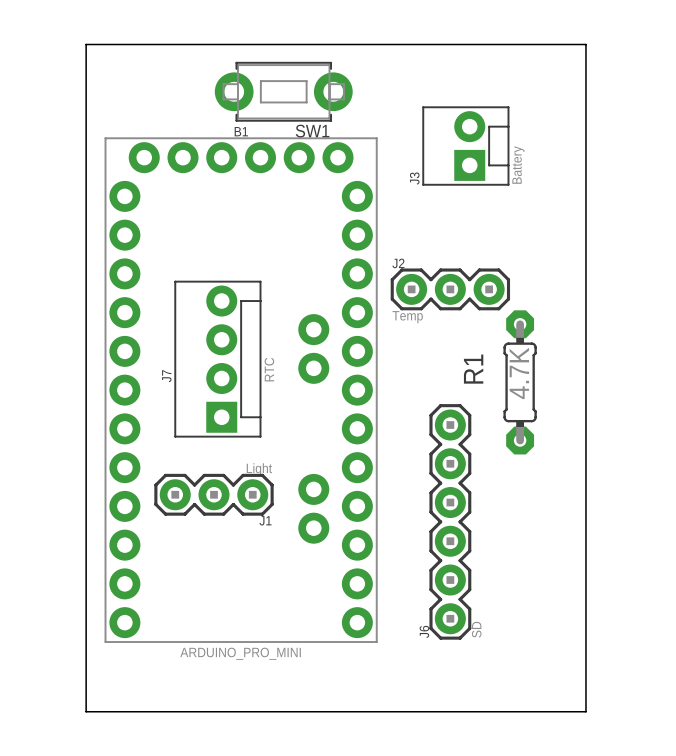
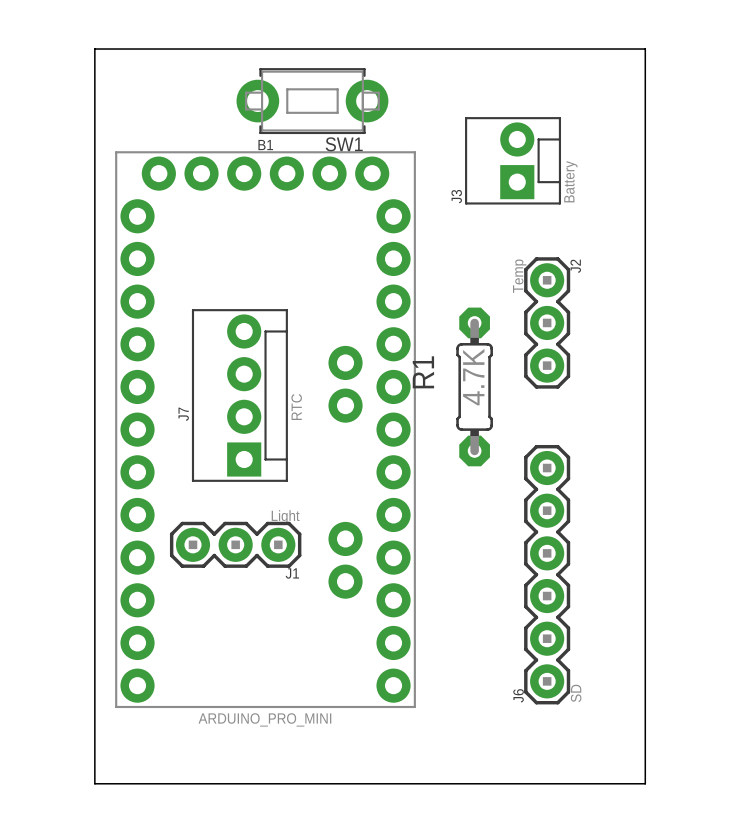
J2 rotation: 0° (450, 289) -> 90° clockwise (547, 322)
R1 position: (520, 382) -> (474, 386)
J6 position: (450, 521) -> (547, 574)

